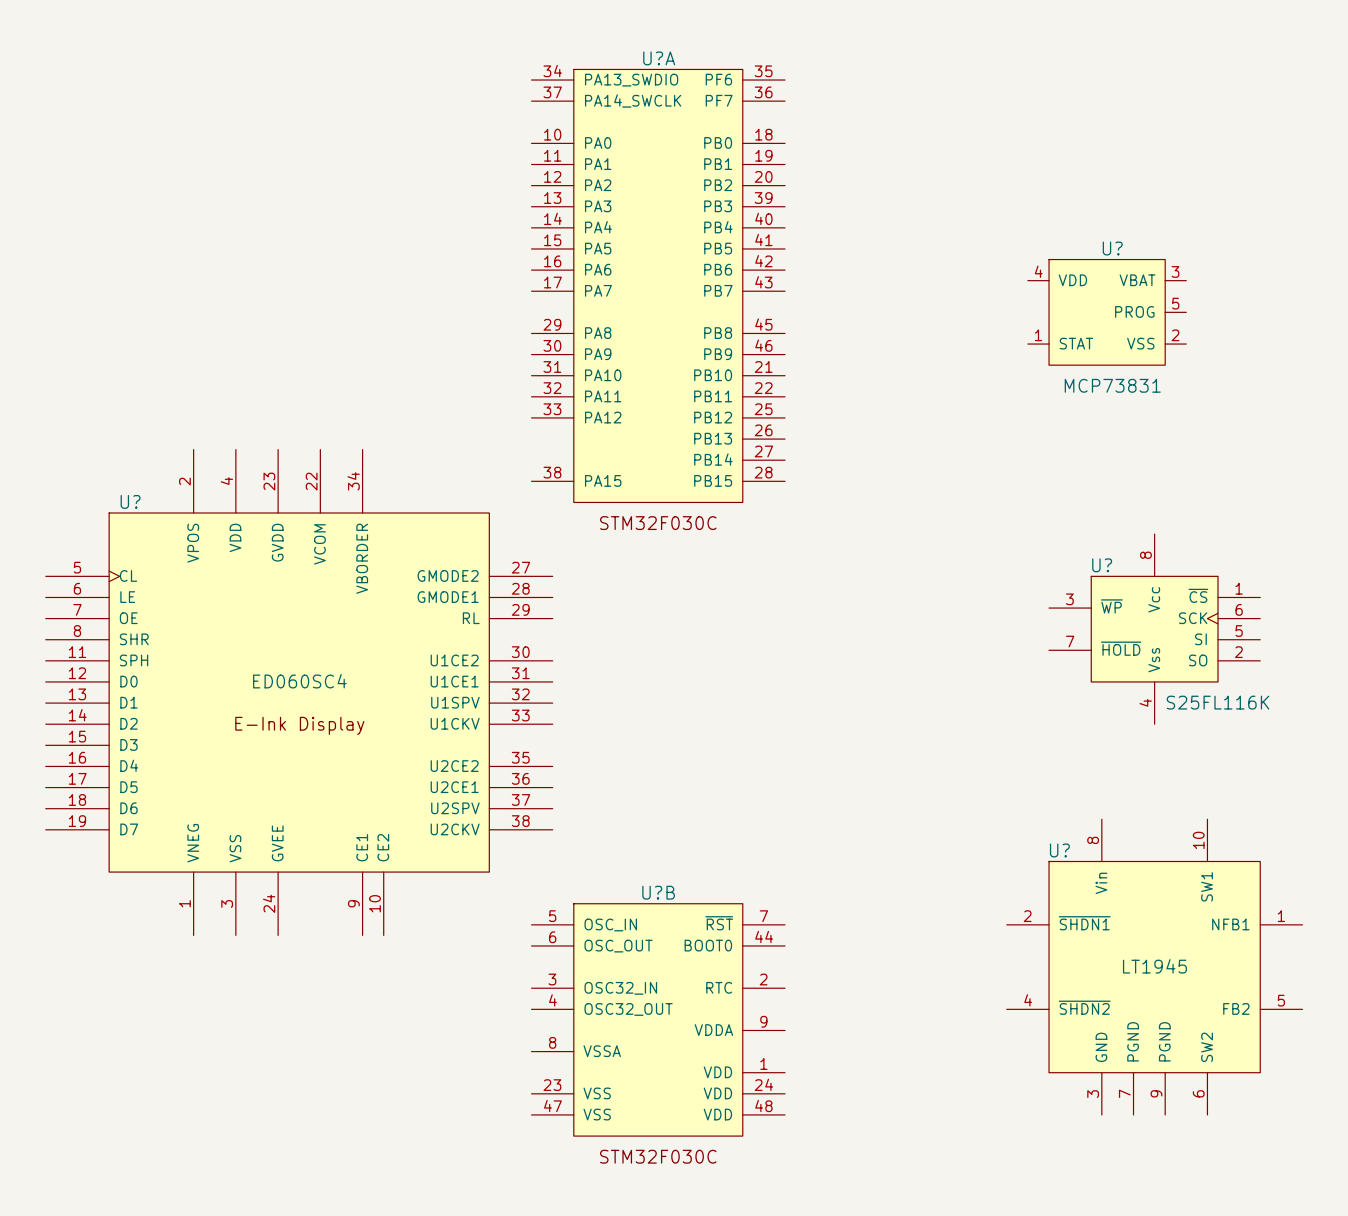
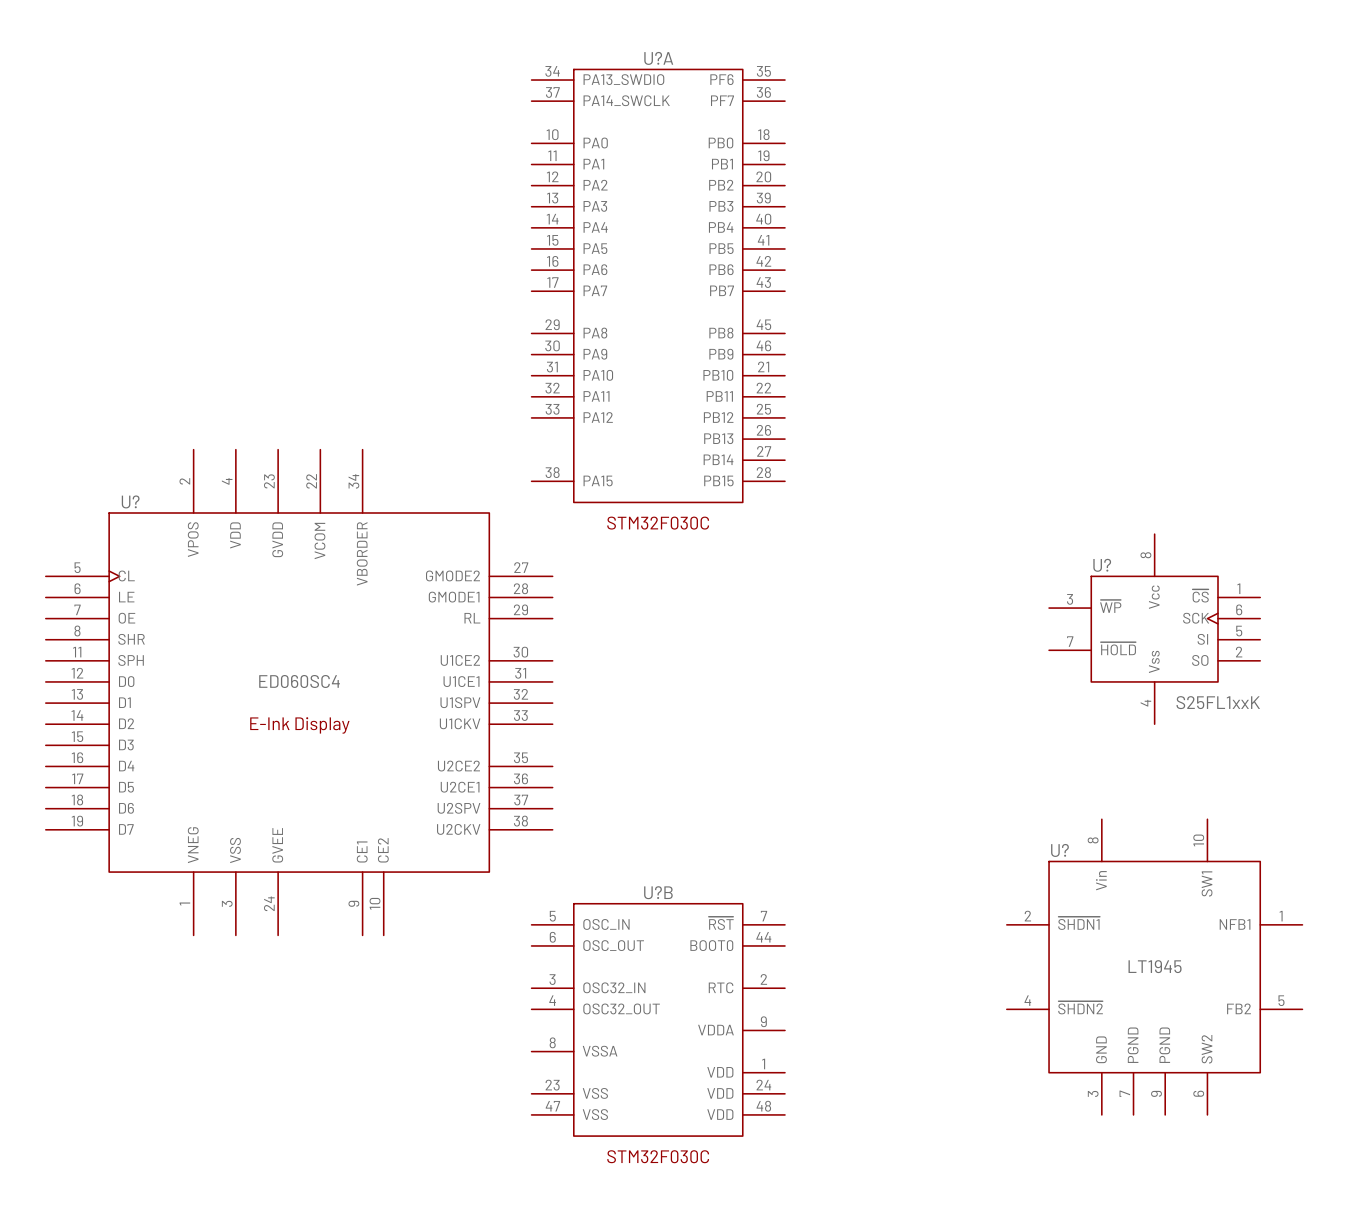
U?: MCP73831 (1107, 312) -> none
U? value: S25FL116K (1218, 702) -> S25FL1xxK (1218, 702)

